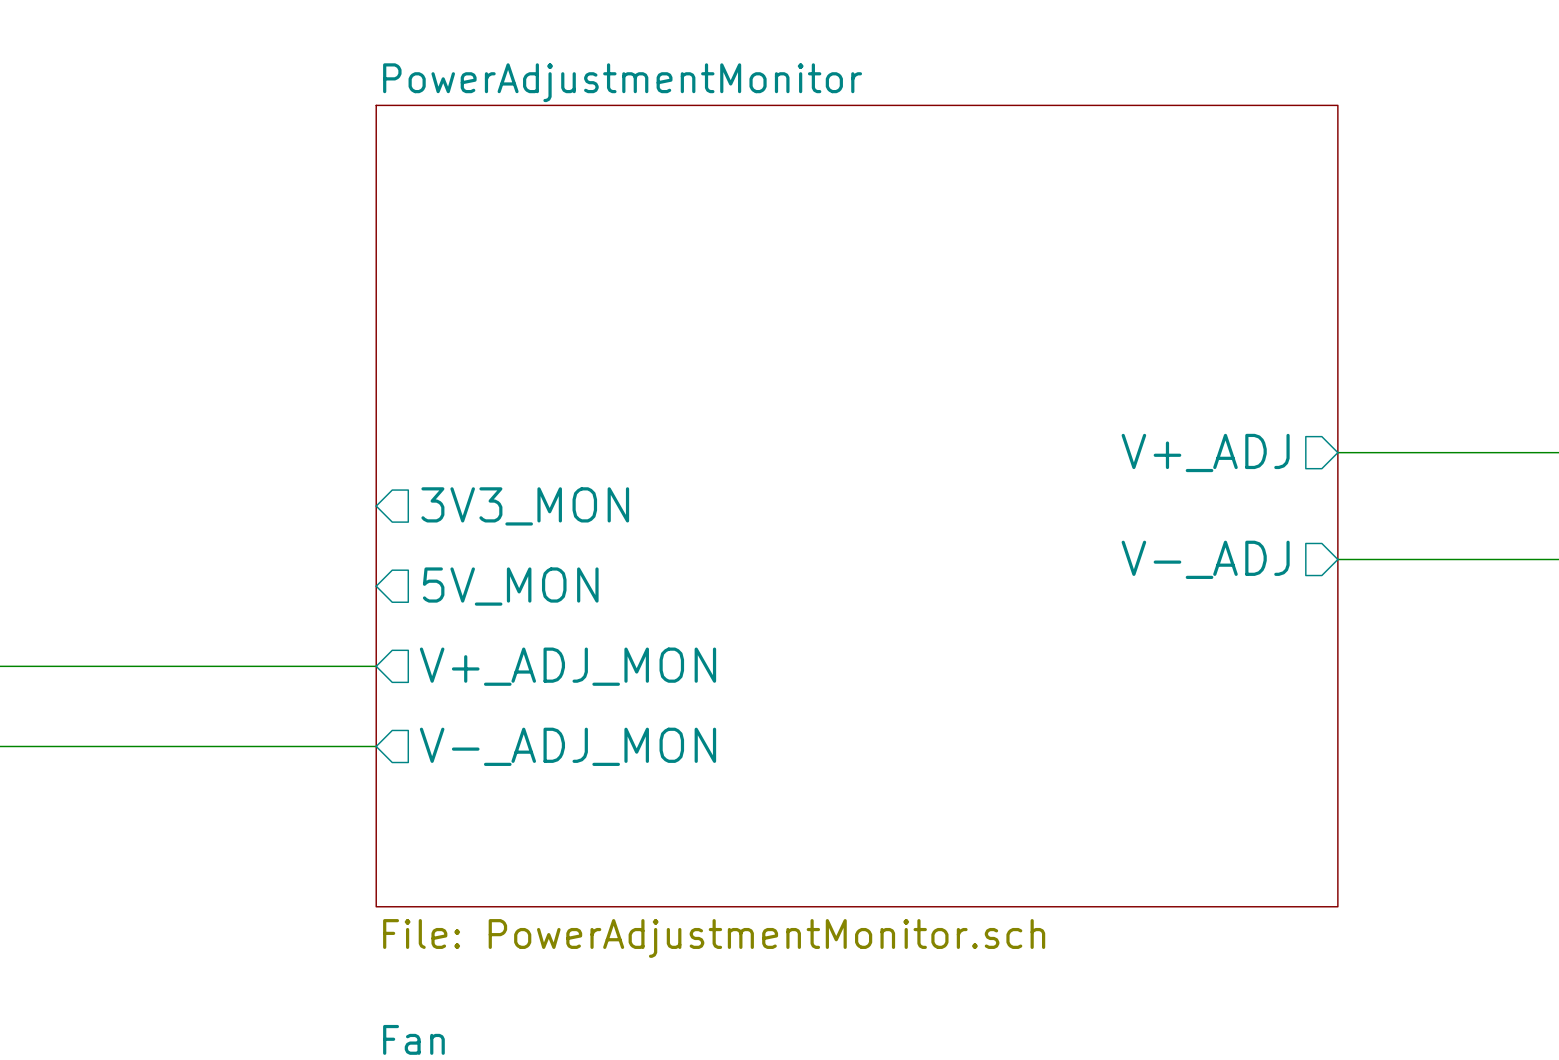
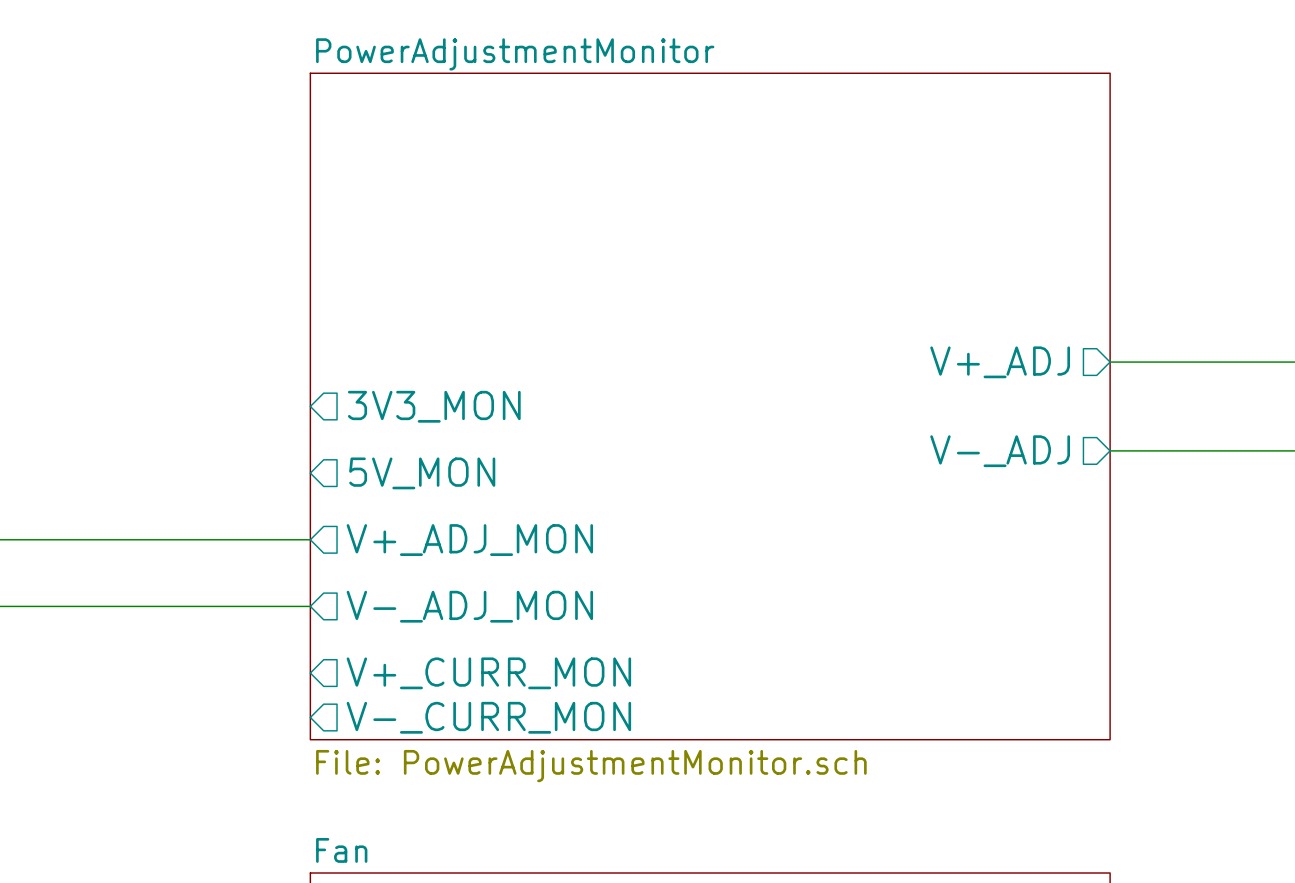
sheet pin: none -> V+_CURR_MON (488, 673)
sheet pin: none -> V-_CURR_MON (488, 717)

